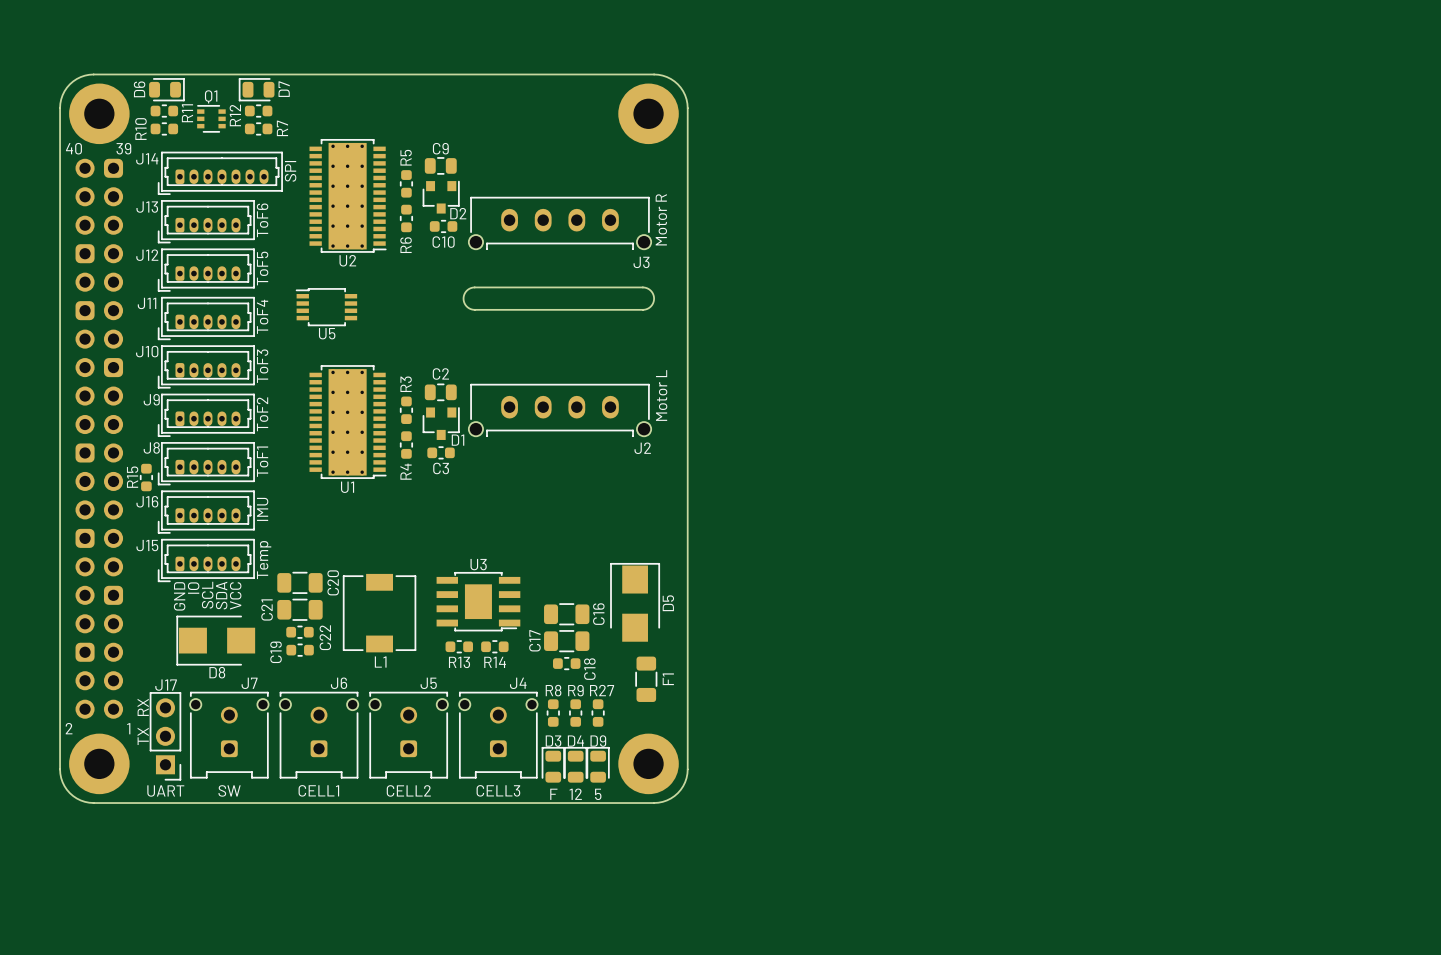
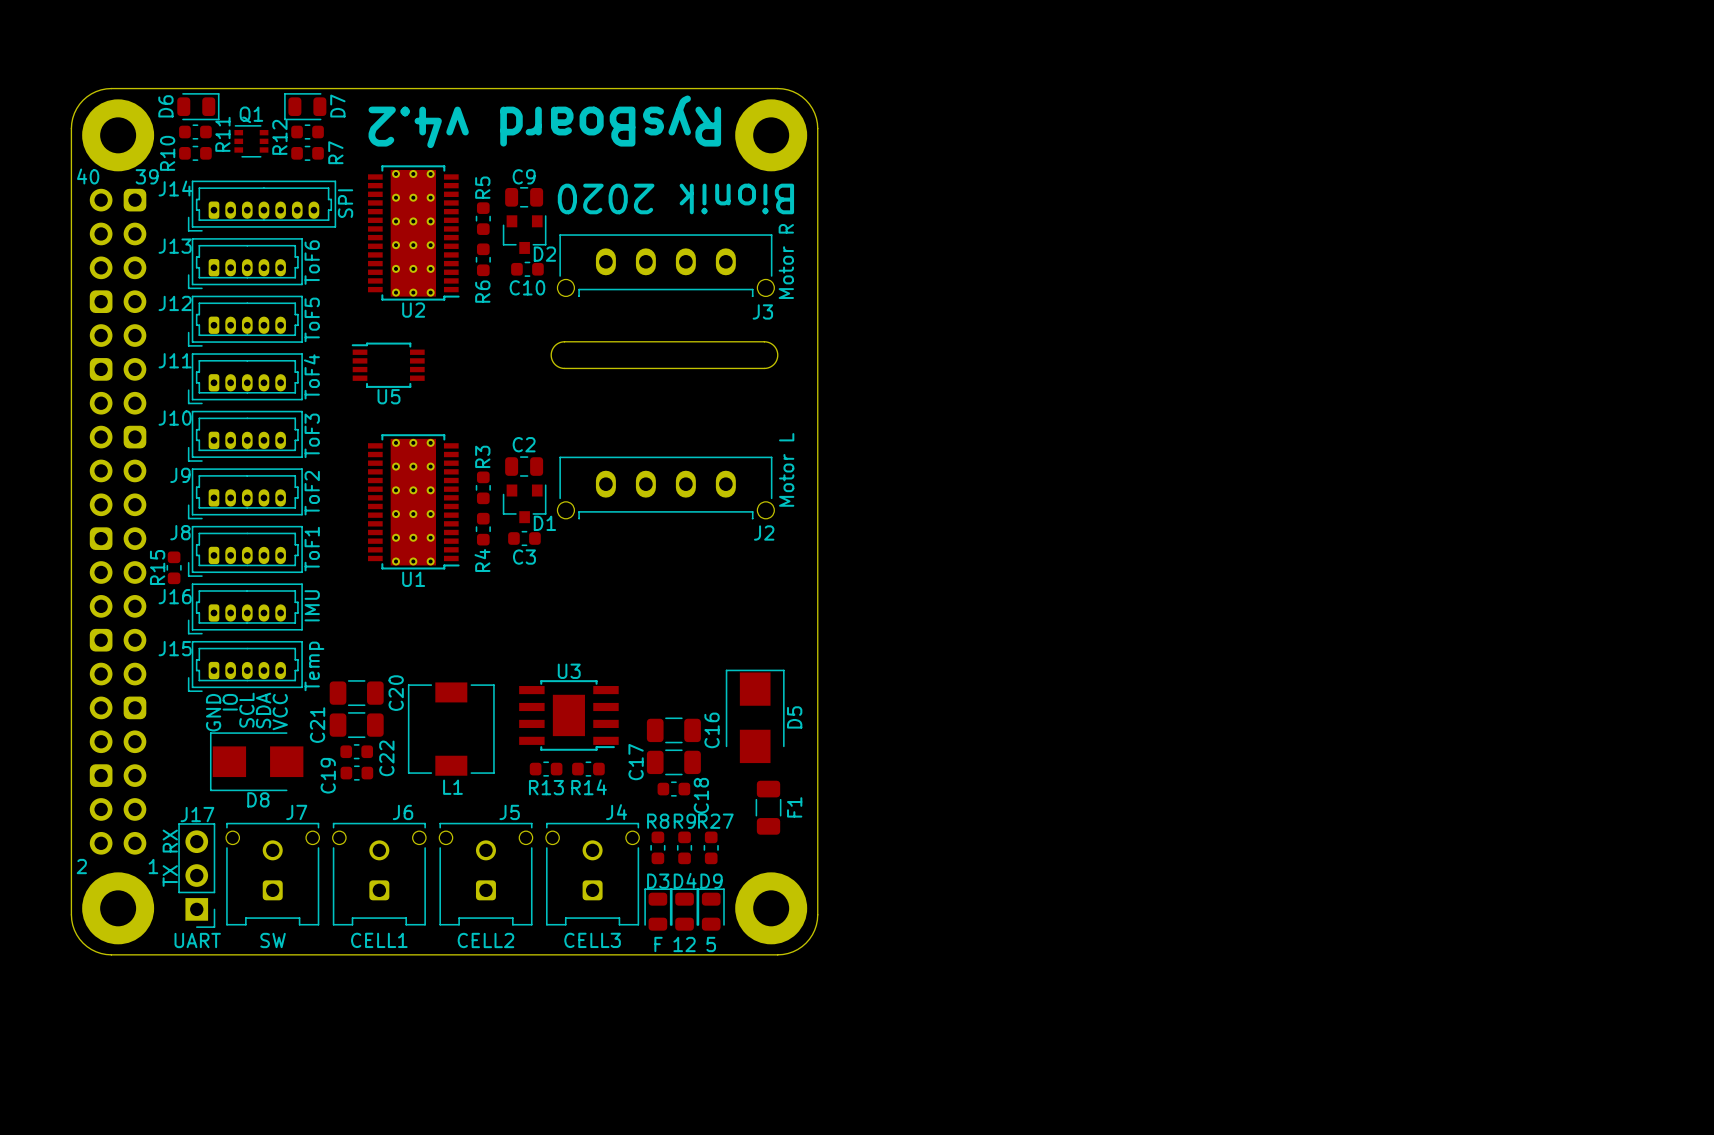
text: none -> RysBoard v4.2 (544, 121)
text: none -> Bionik 2020 (675, 198)

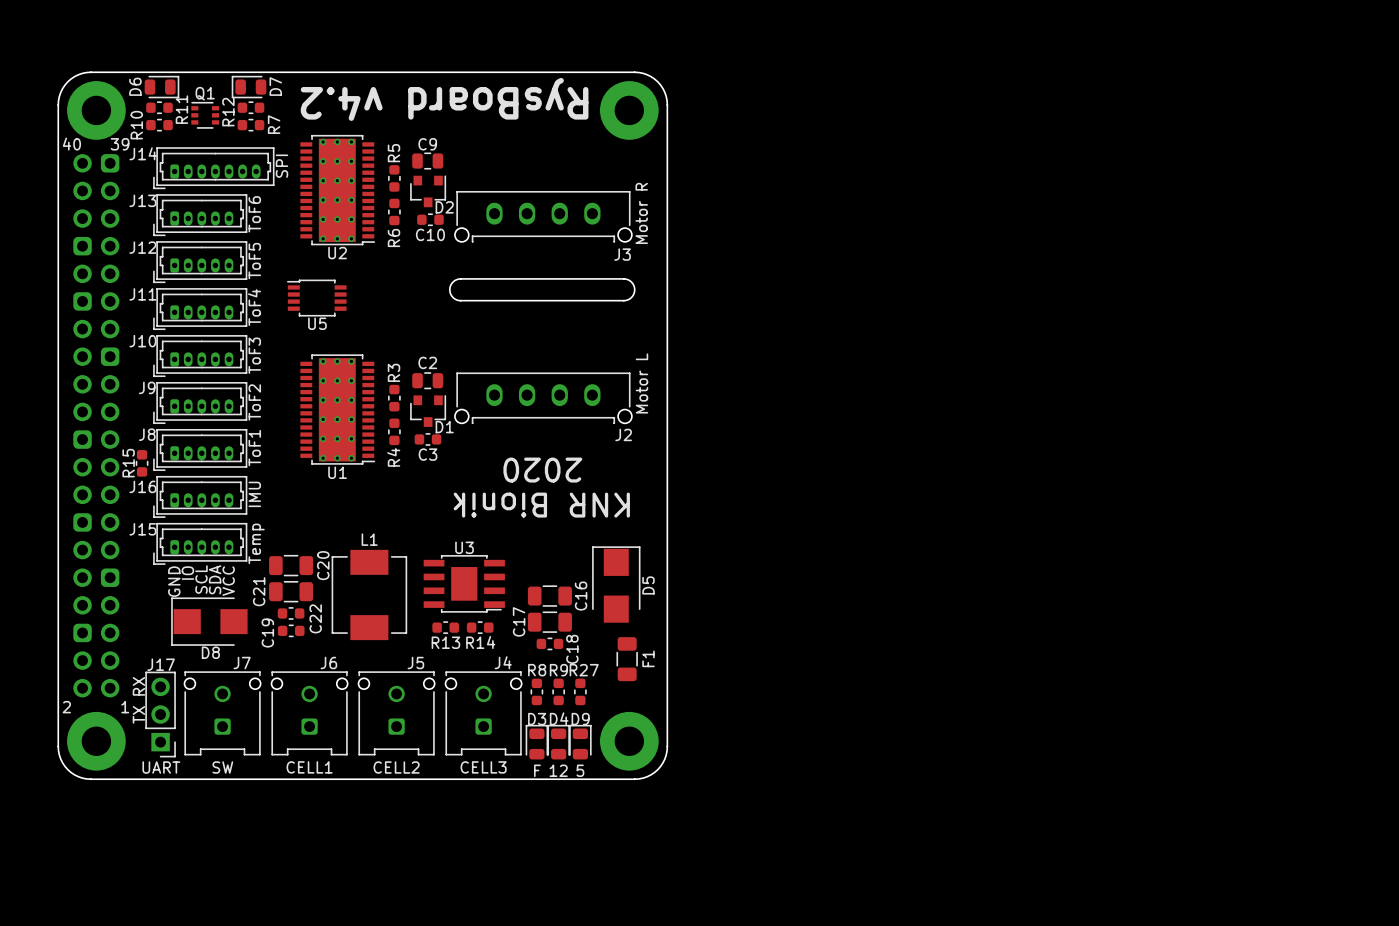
text: Bionik 2020 (675, 198) -> none
text: none -> 2020 (542, 470)
text: none -> KNR Bionik (541, 505)
L1 footprint: [407, 682, 495, 776] -> [331, 549, 408, 641]
L1 name position: L1 (452, 787) -> L1 (369, 539)

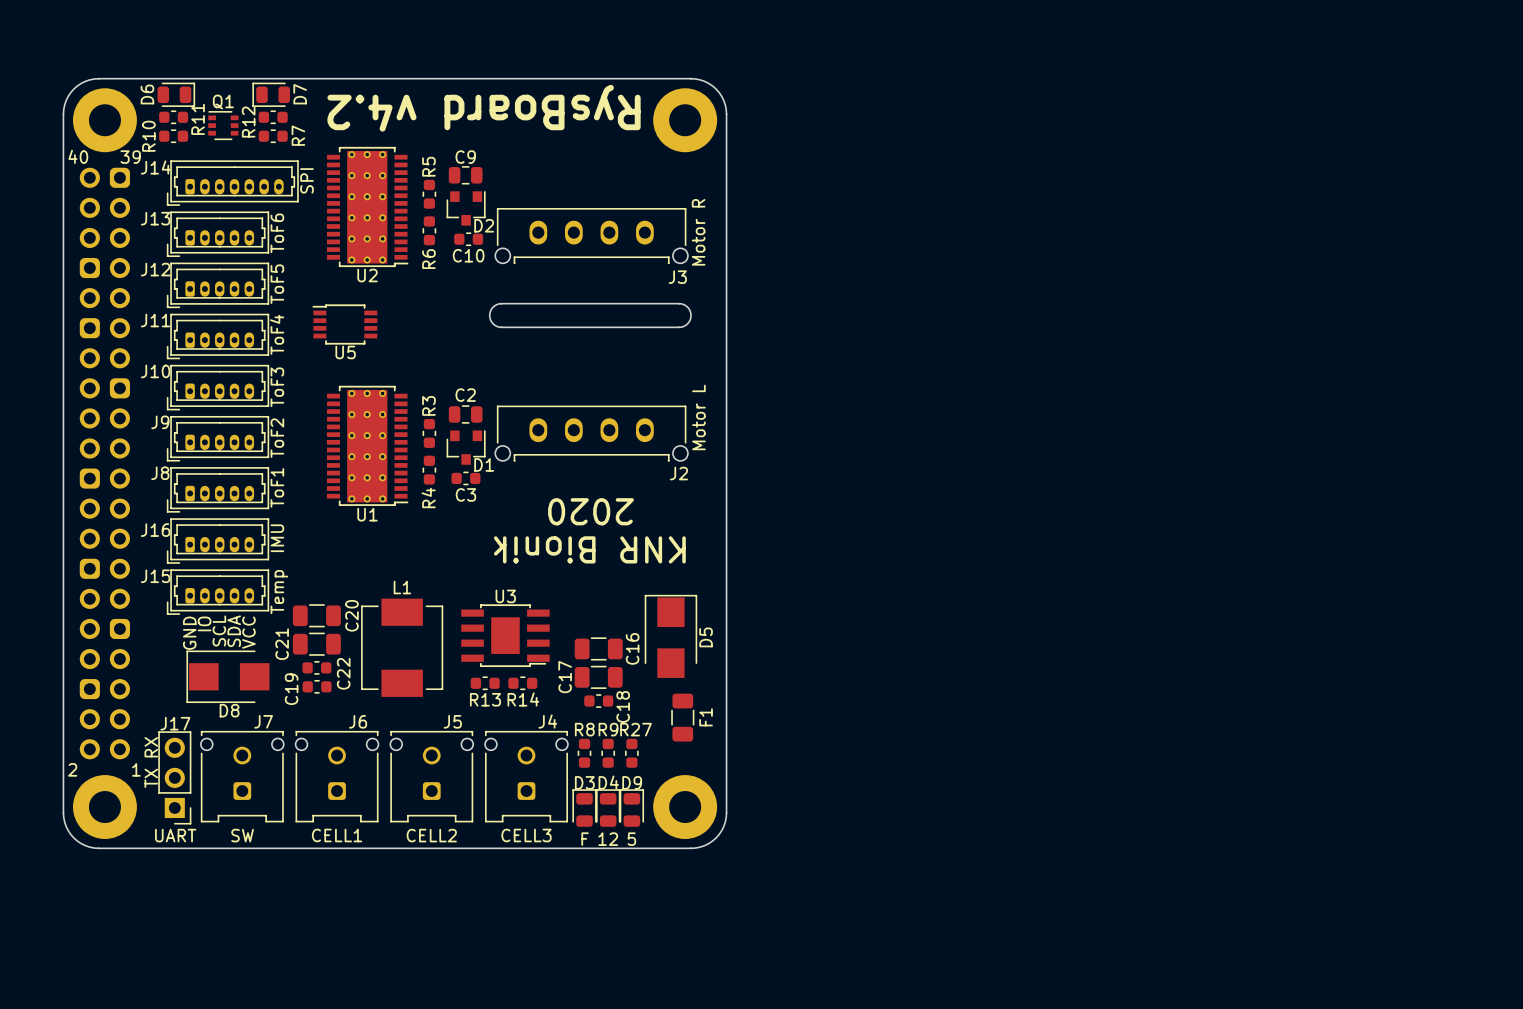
R15: (142, 463) -> none

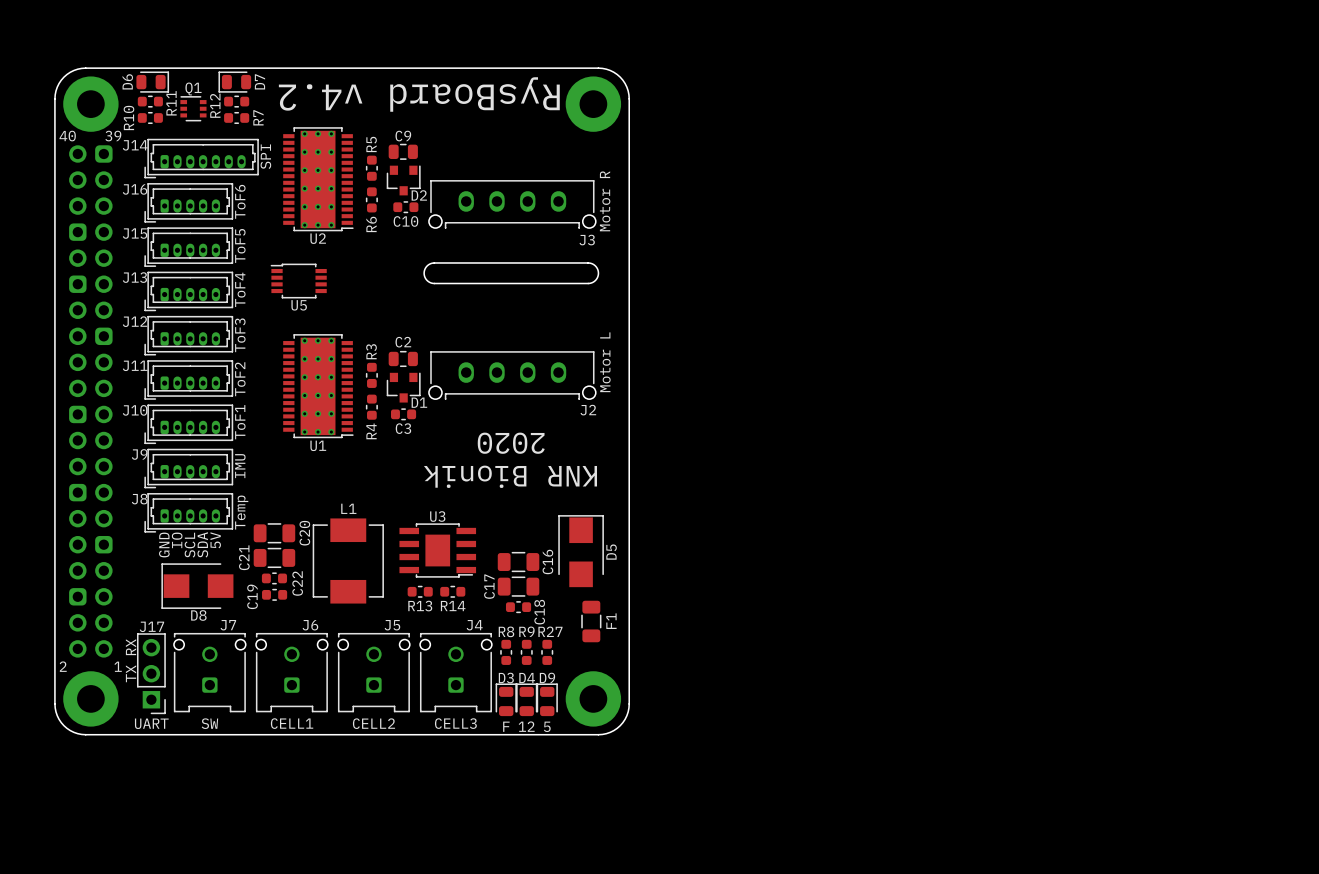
J13 name: J13 (155, 218) -> J16 (135, 189)
J12 name: J12 (155, 269) -> J15 (135, 233)
J11 name: J11 (155, 320) -> J13 (134, 277)
J10 name: J10 (155, 371) -> J12 (135, 321)
J9 name: J9 (160, 422) -> J11 (135, 365)
J8 name: J8 (160, 473) -> J10 (135, 410)
J16 name: J16 (155, 530) -> J9 (139, 454)
J15 name: J15 (155, 576) -> J8 (139, 499)
J15 text: VCC (248, 632) -> 5V (215, 540)

